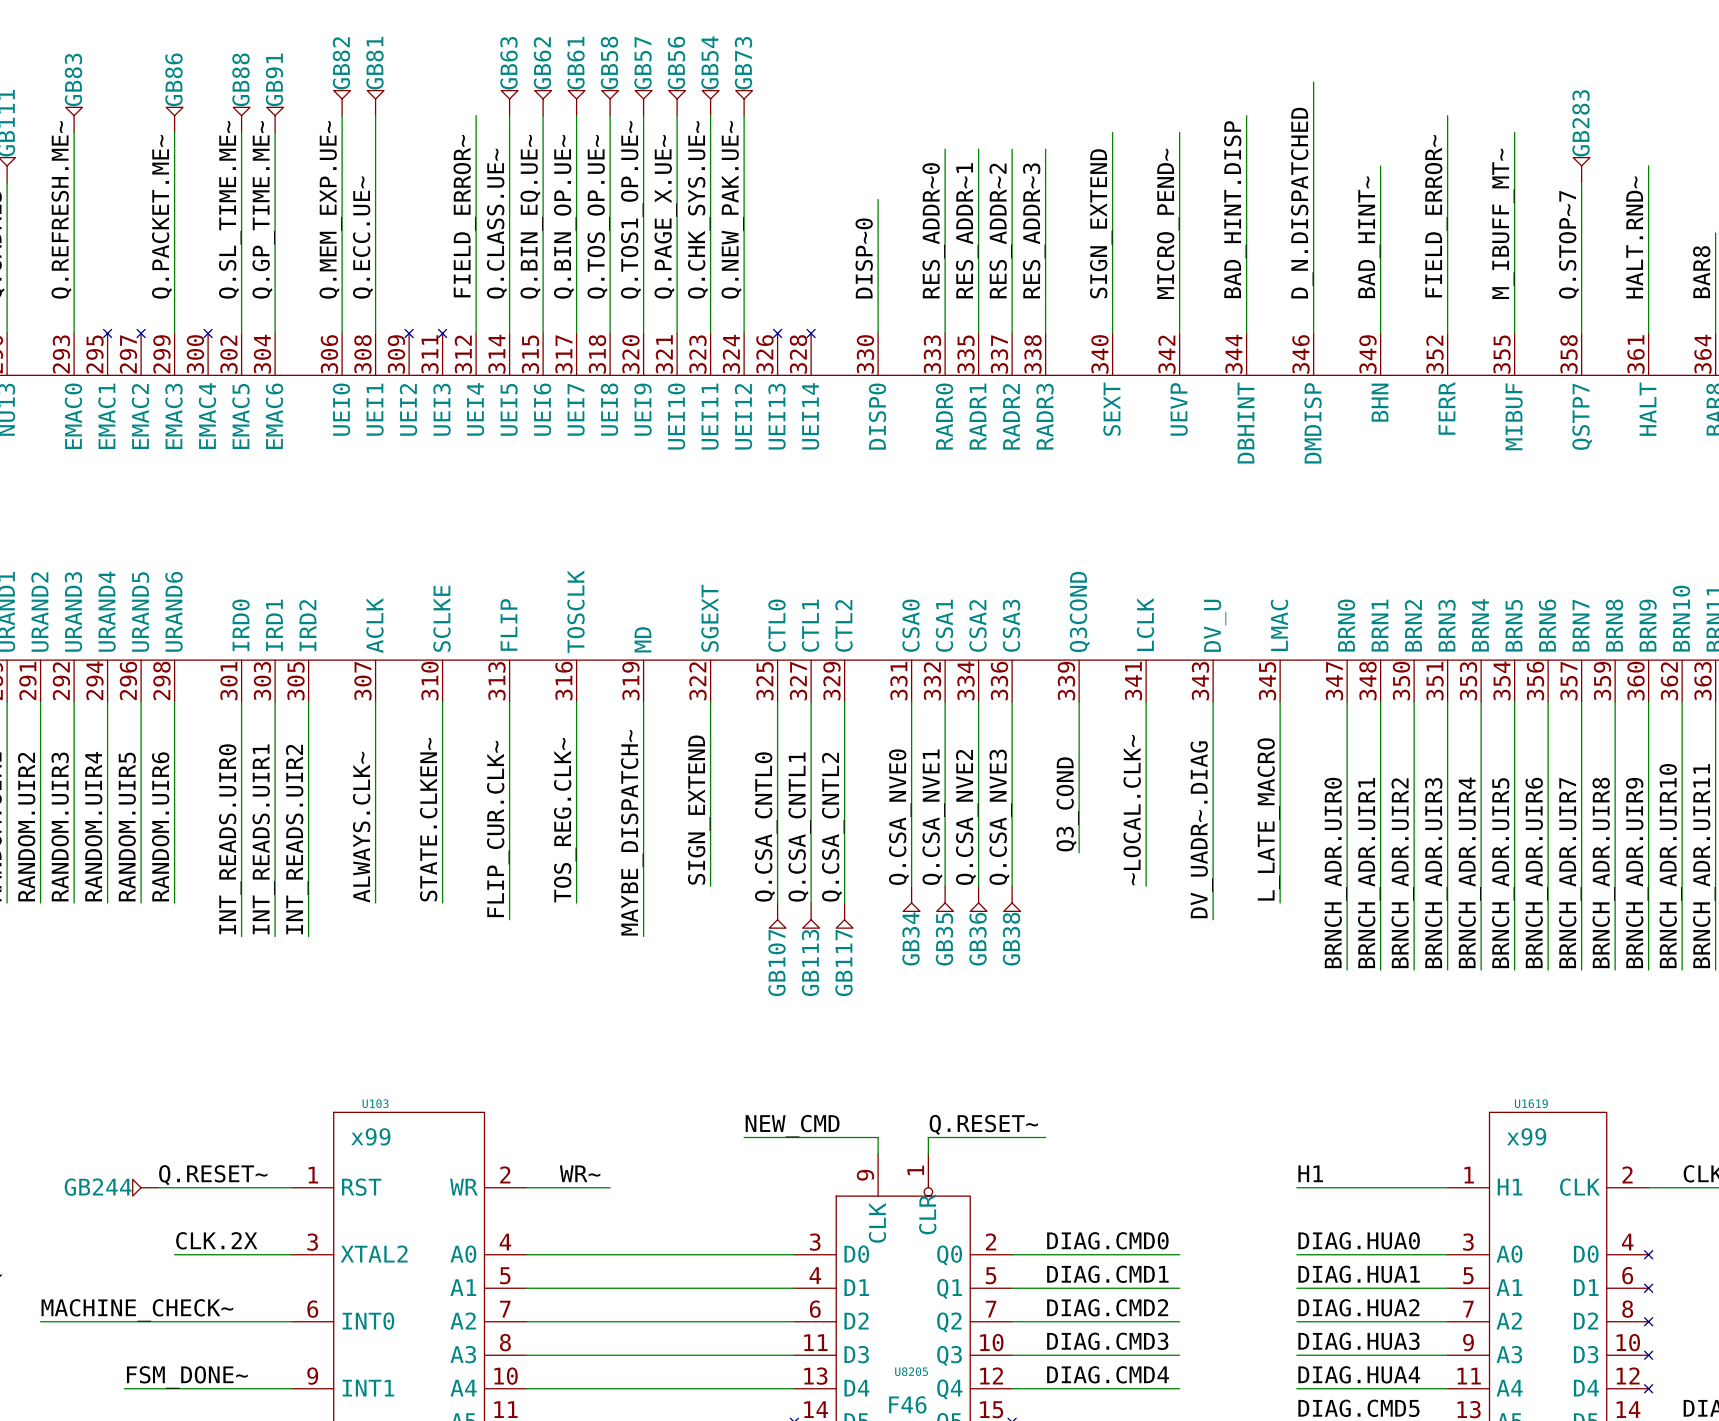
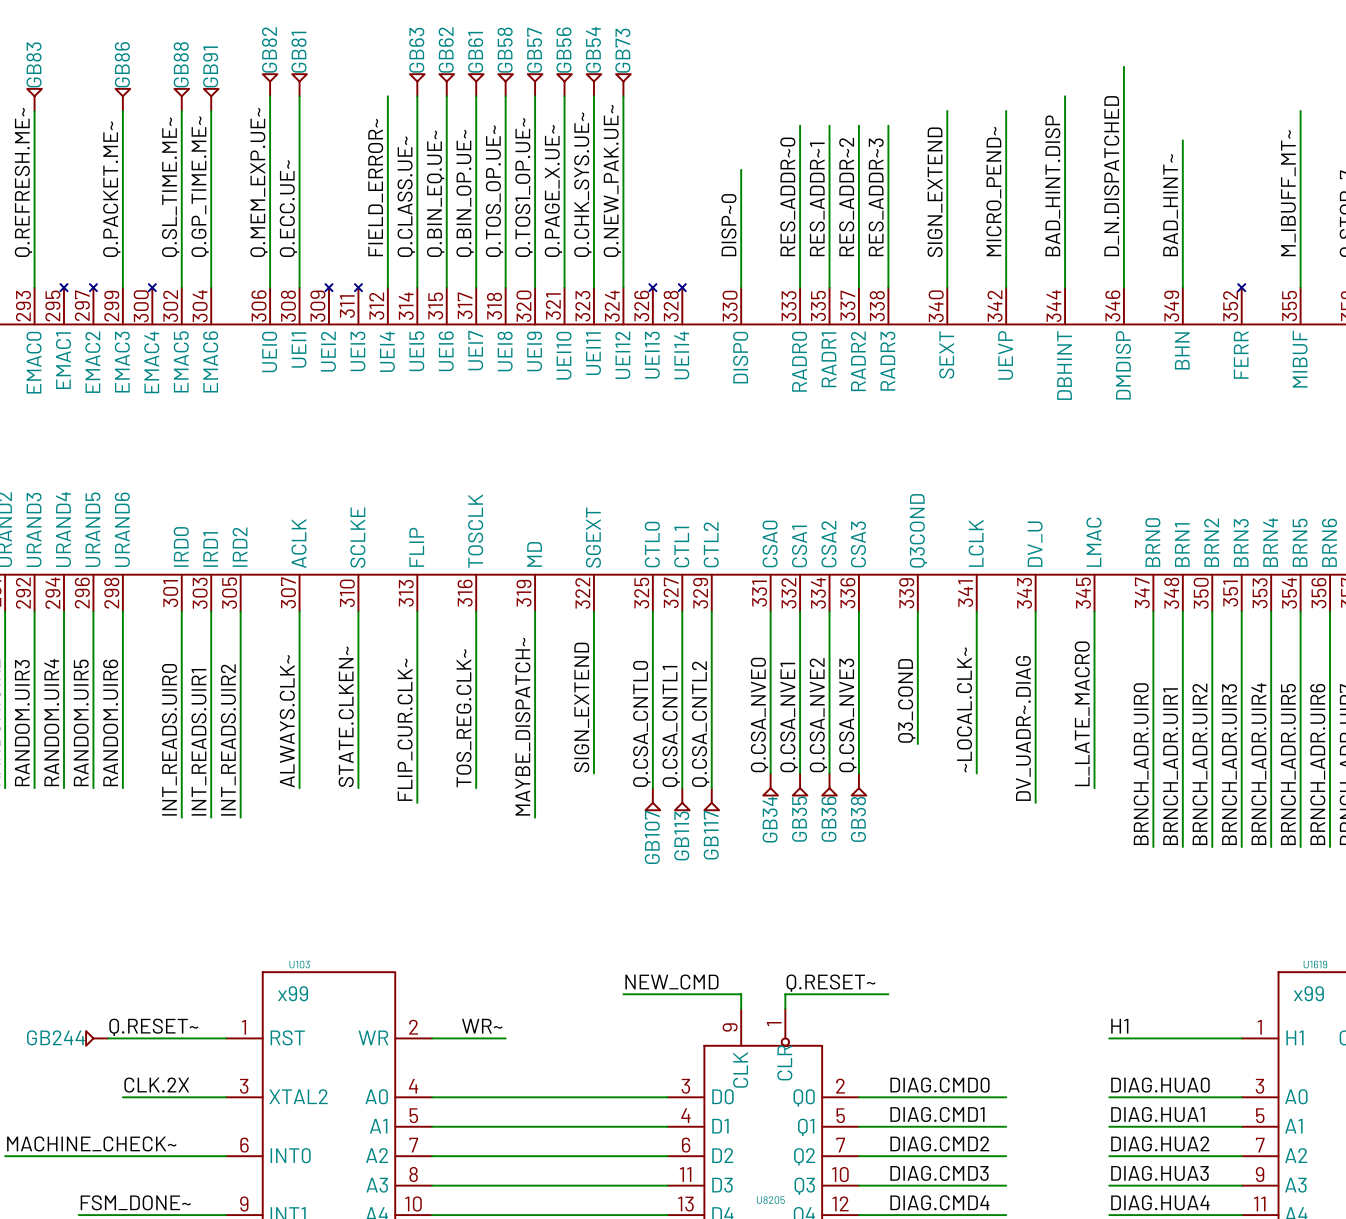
wire: (1447, 115) (1447, 333) -> none
label: FIELD_ERROR~ (1436, 216) -> none
no-connect mark: none -> (1241, 287)

